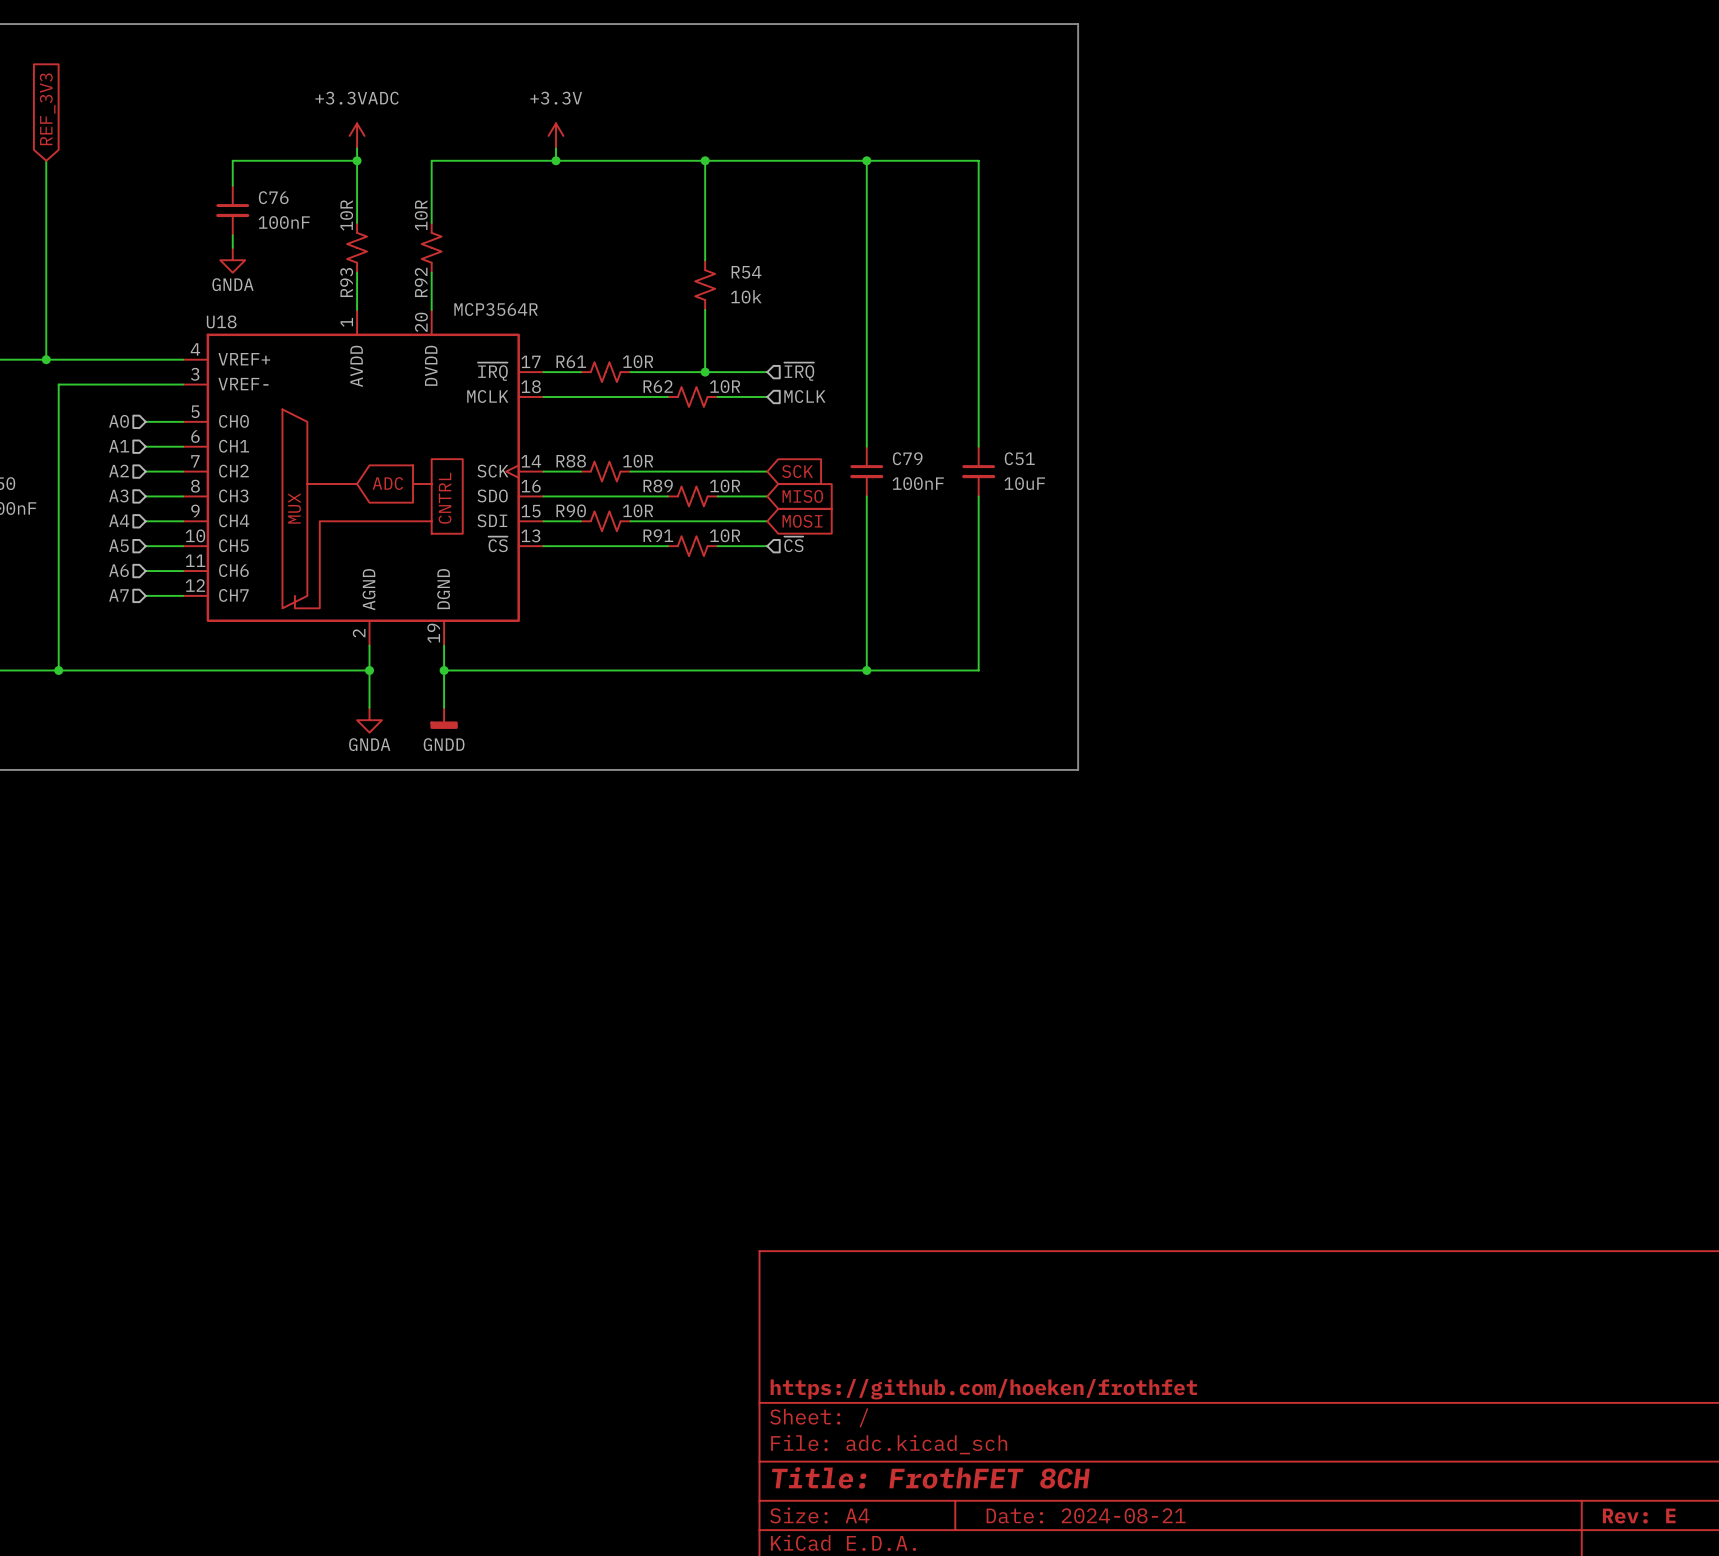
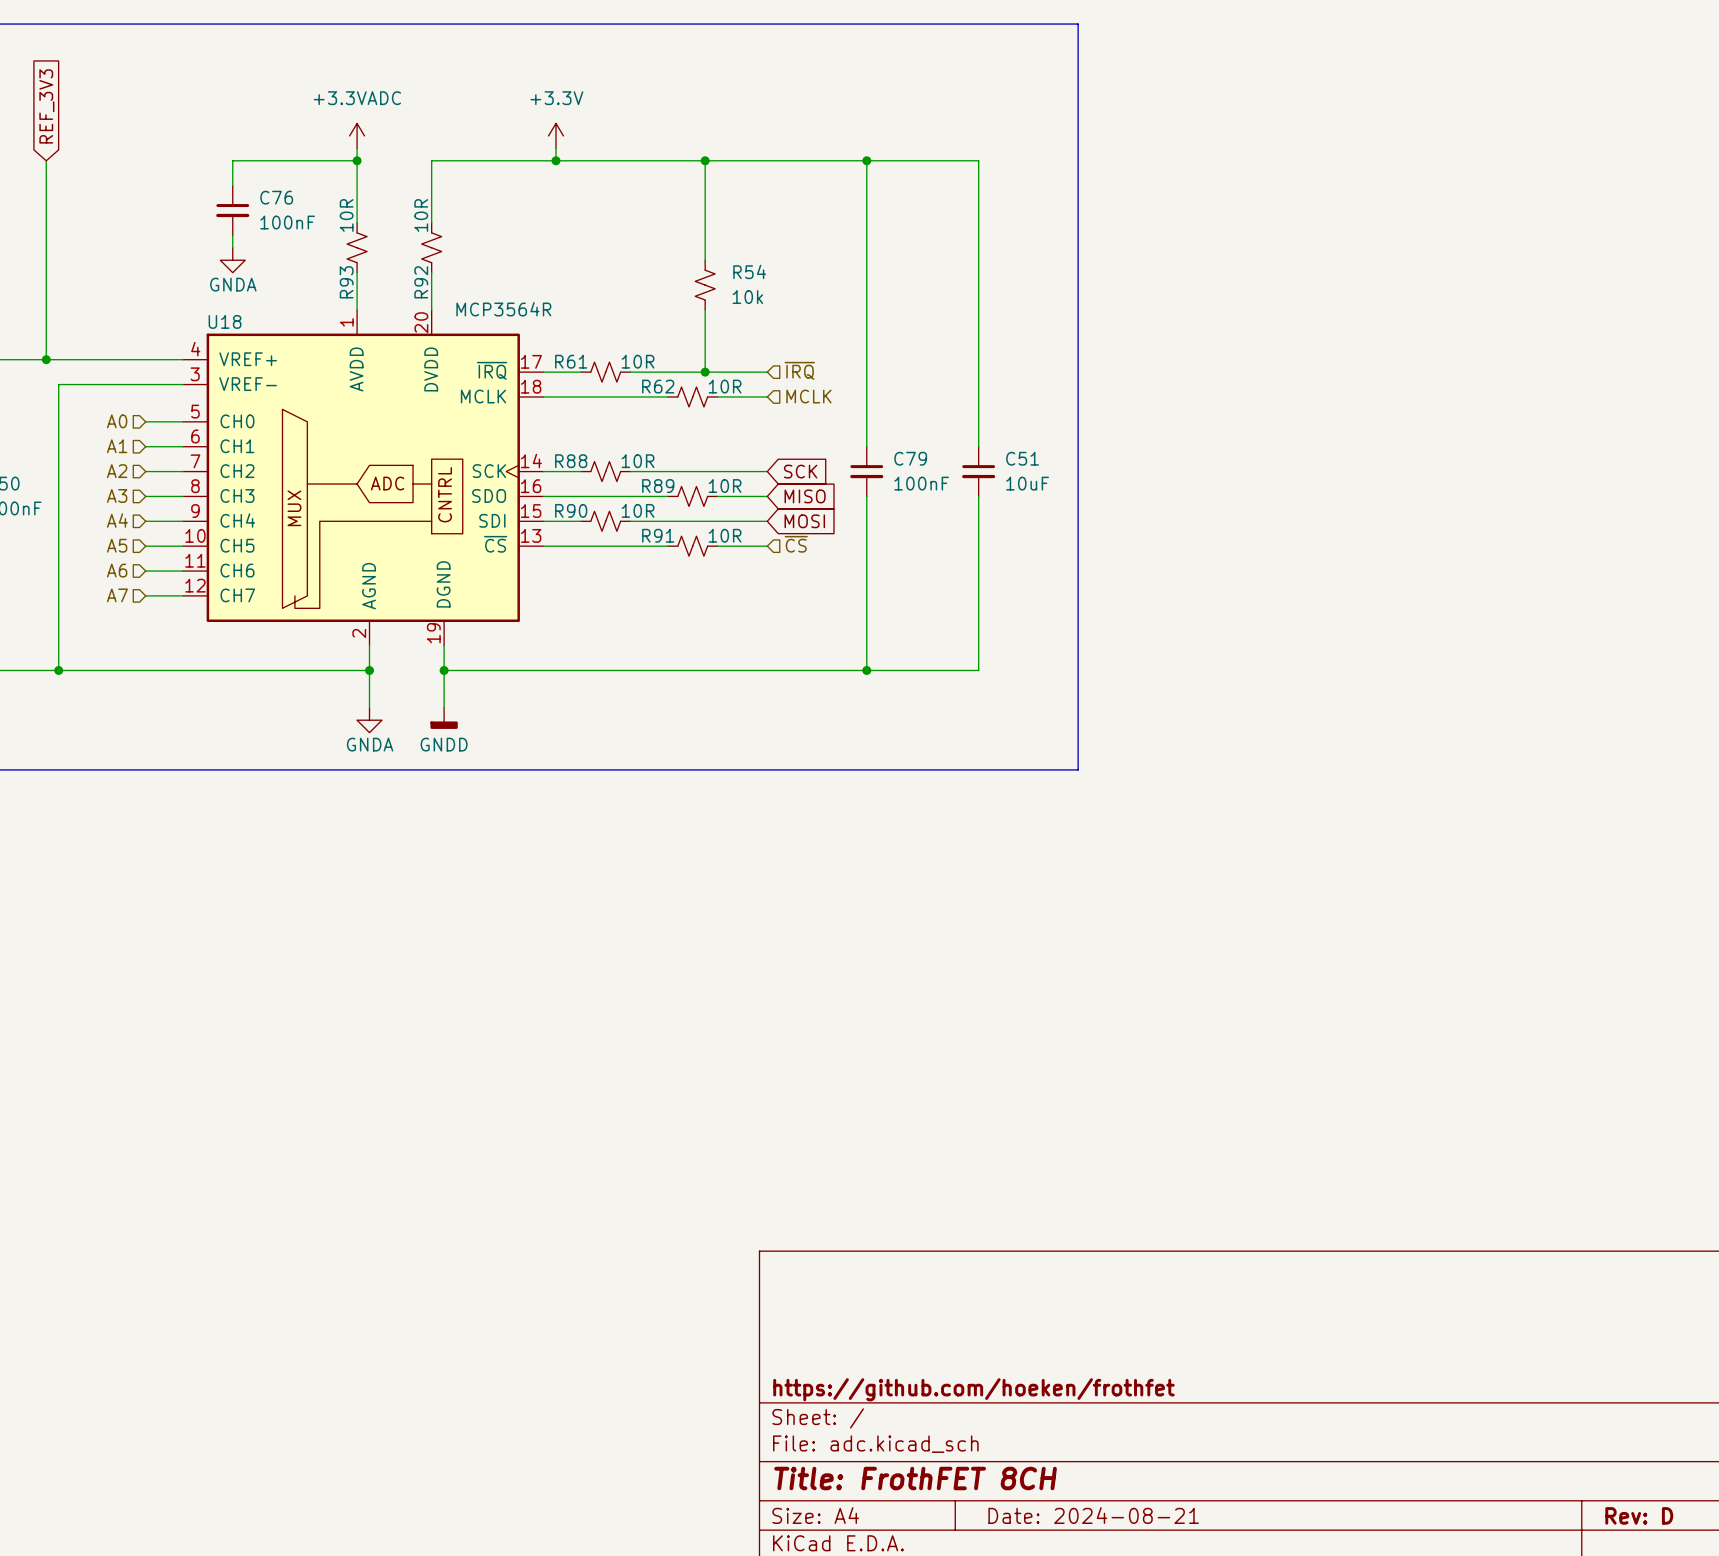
title block: Rev: E (1639, 1516) -> Rev: D (1639, 1515)

